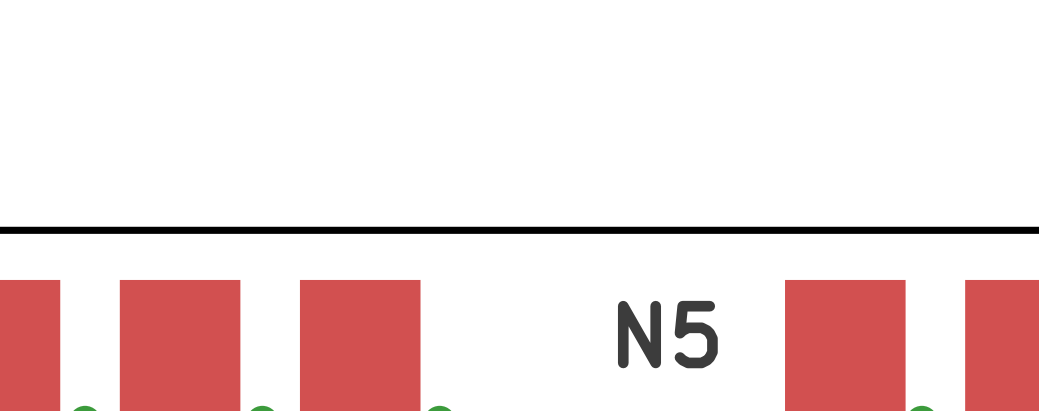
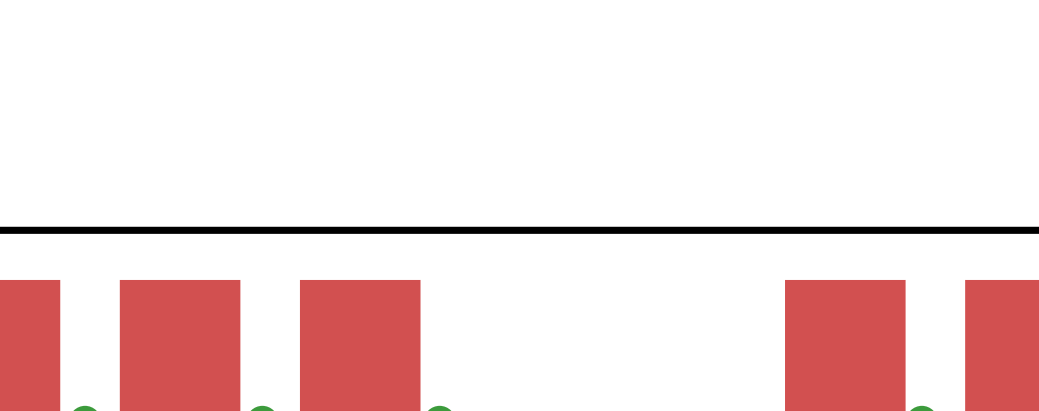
text: N5 (667, 334) -> none

